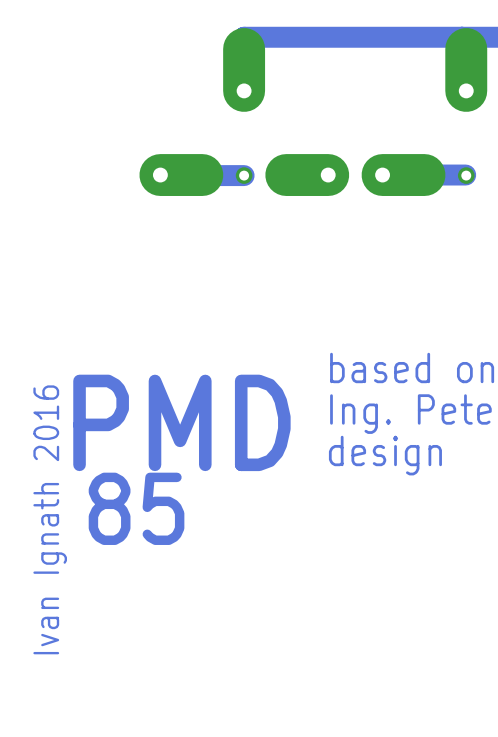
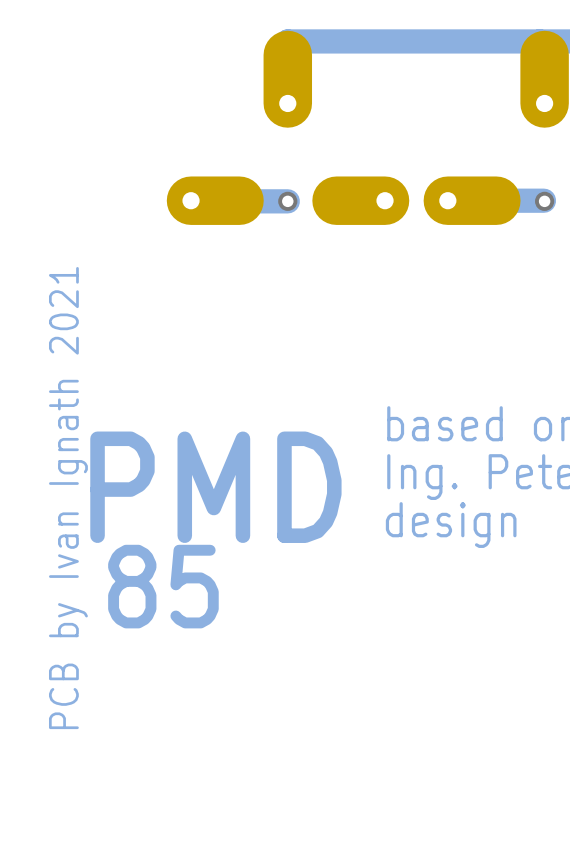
text: Ivan Ignath 2016 (50, 519) -> PCB by Ivan Ignath 2021 (68, 498)

